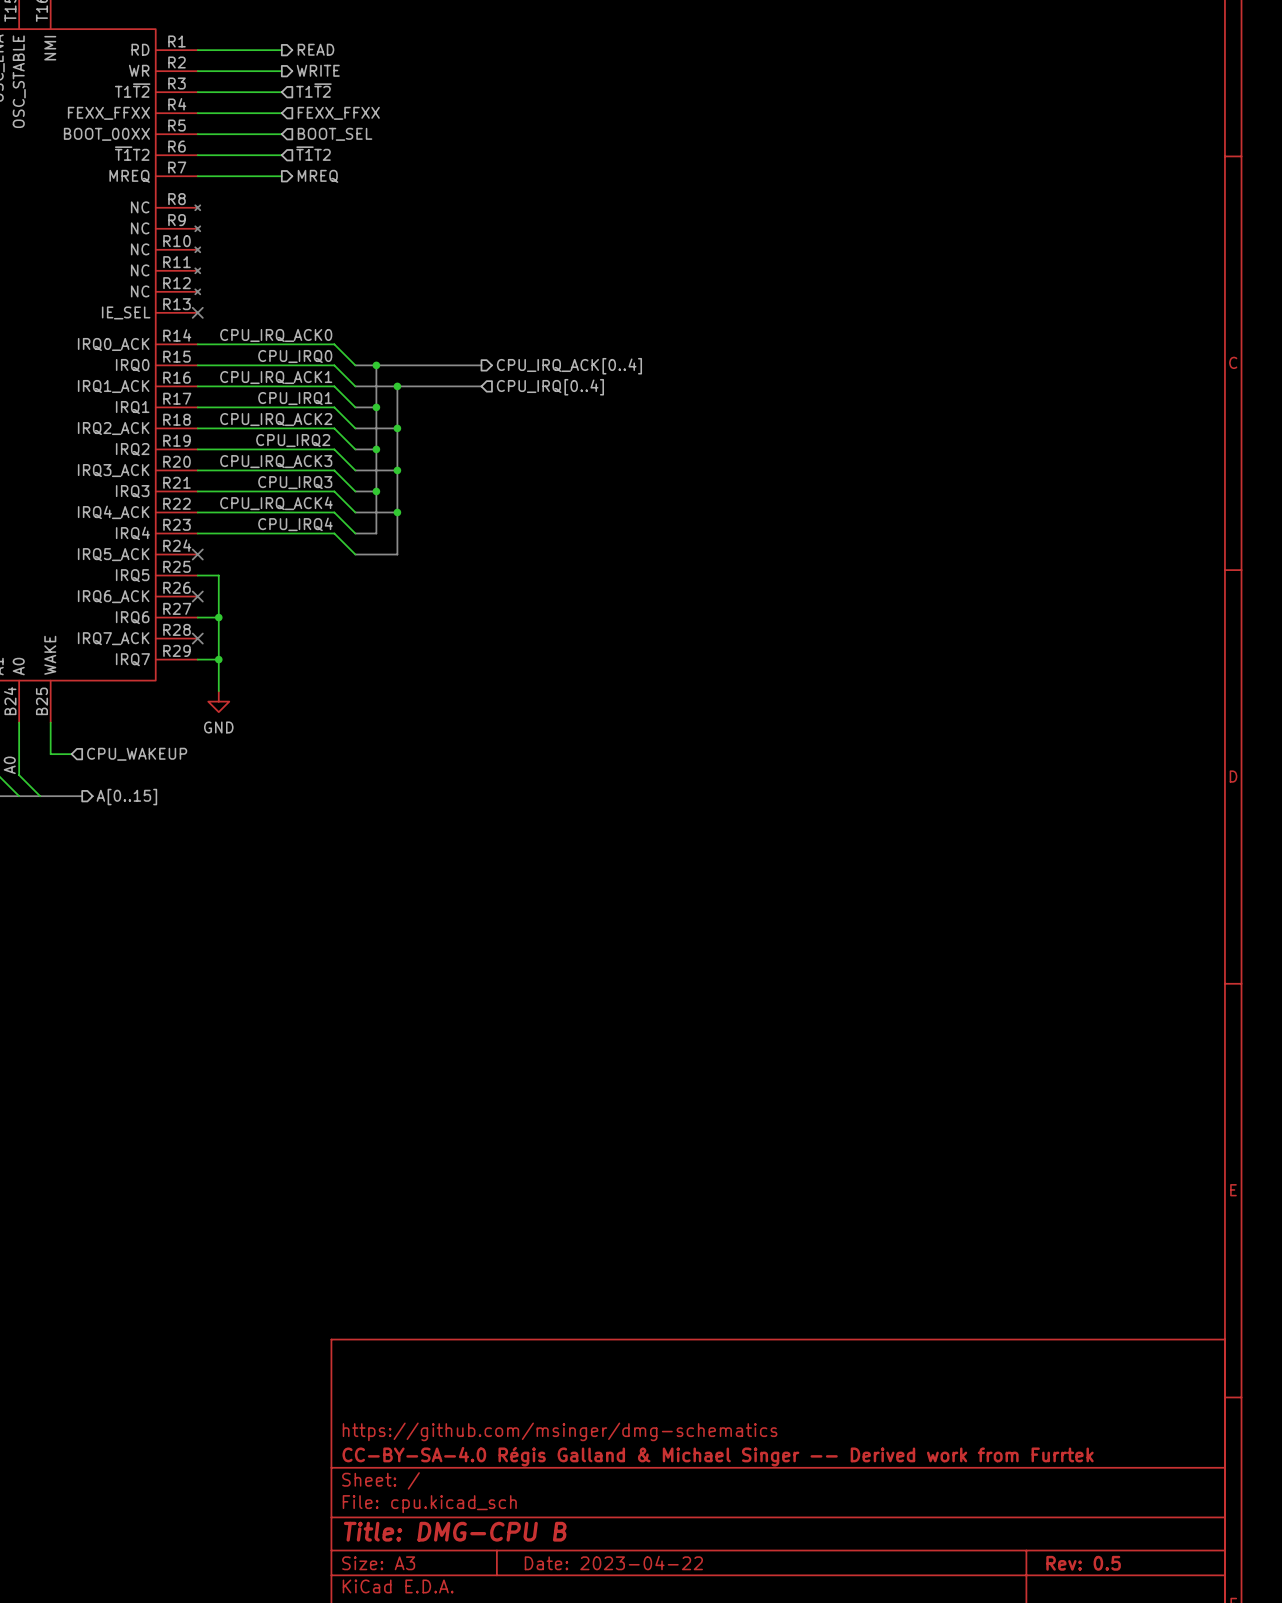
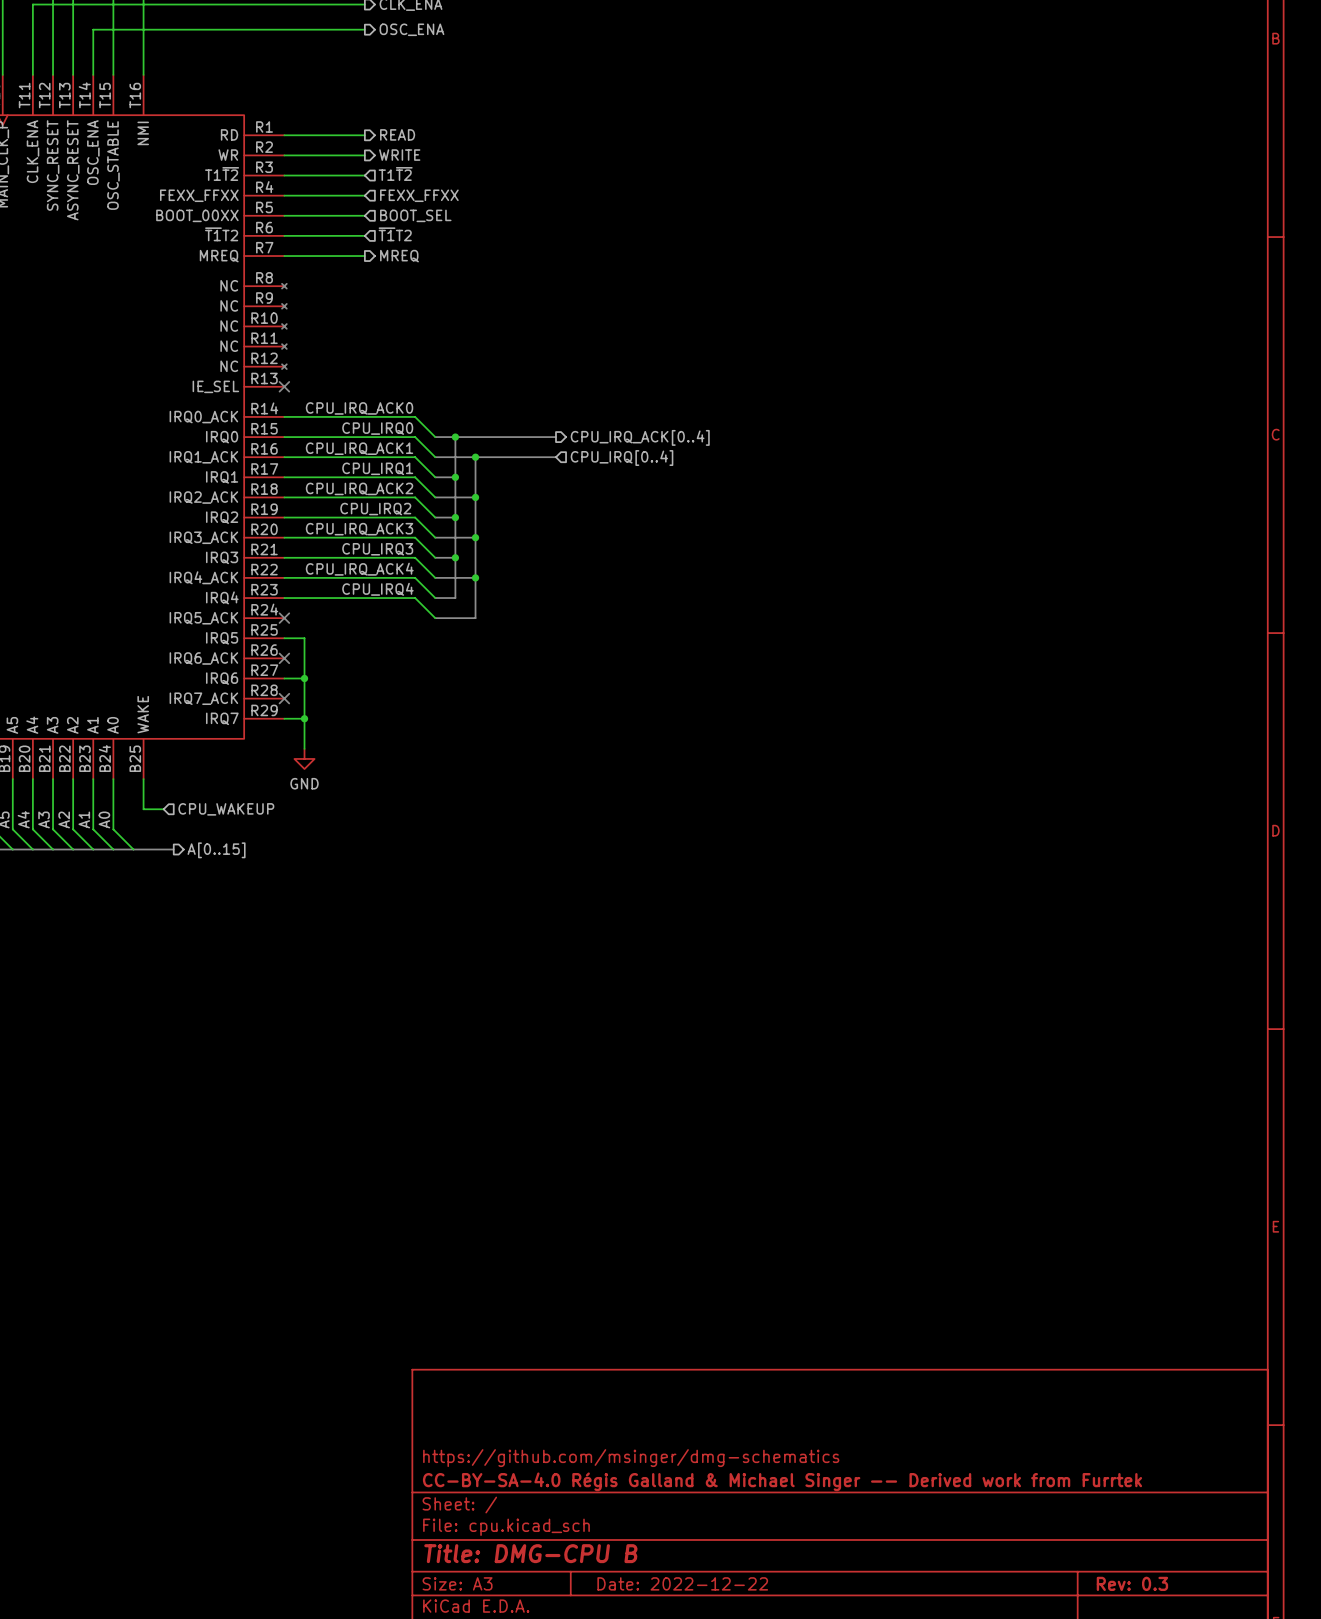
title block: Date: 2023-04-22 (613, 1563) -> Date: 2022-12-22 (682, 1583)
title block: Rev: 0.5 (1083, 1563) -> Rev: 0.3 (1132, 1583)

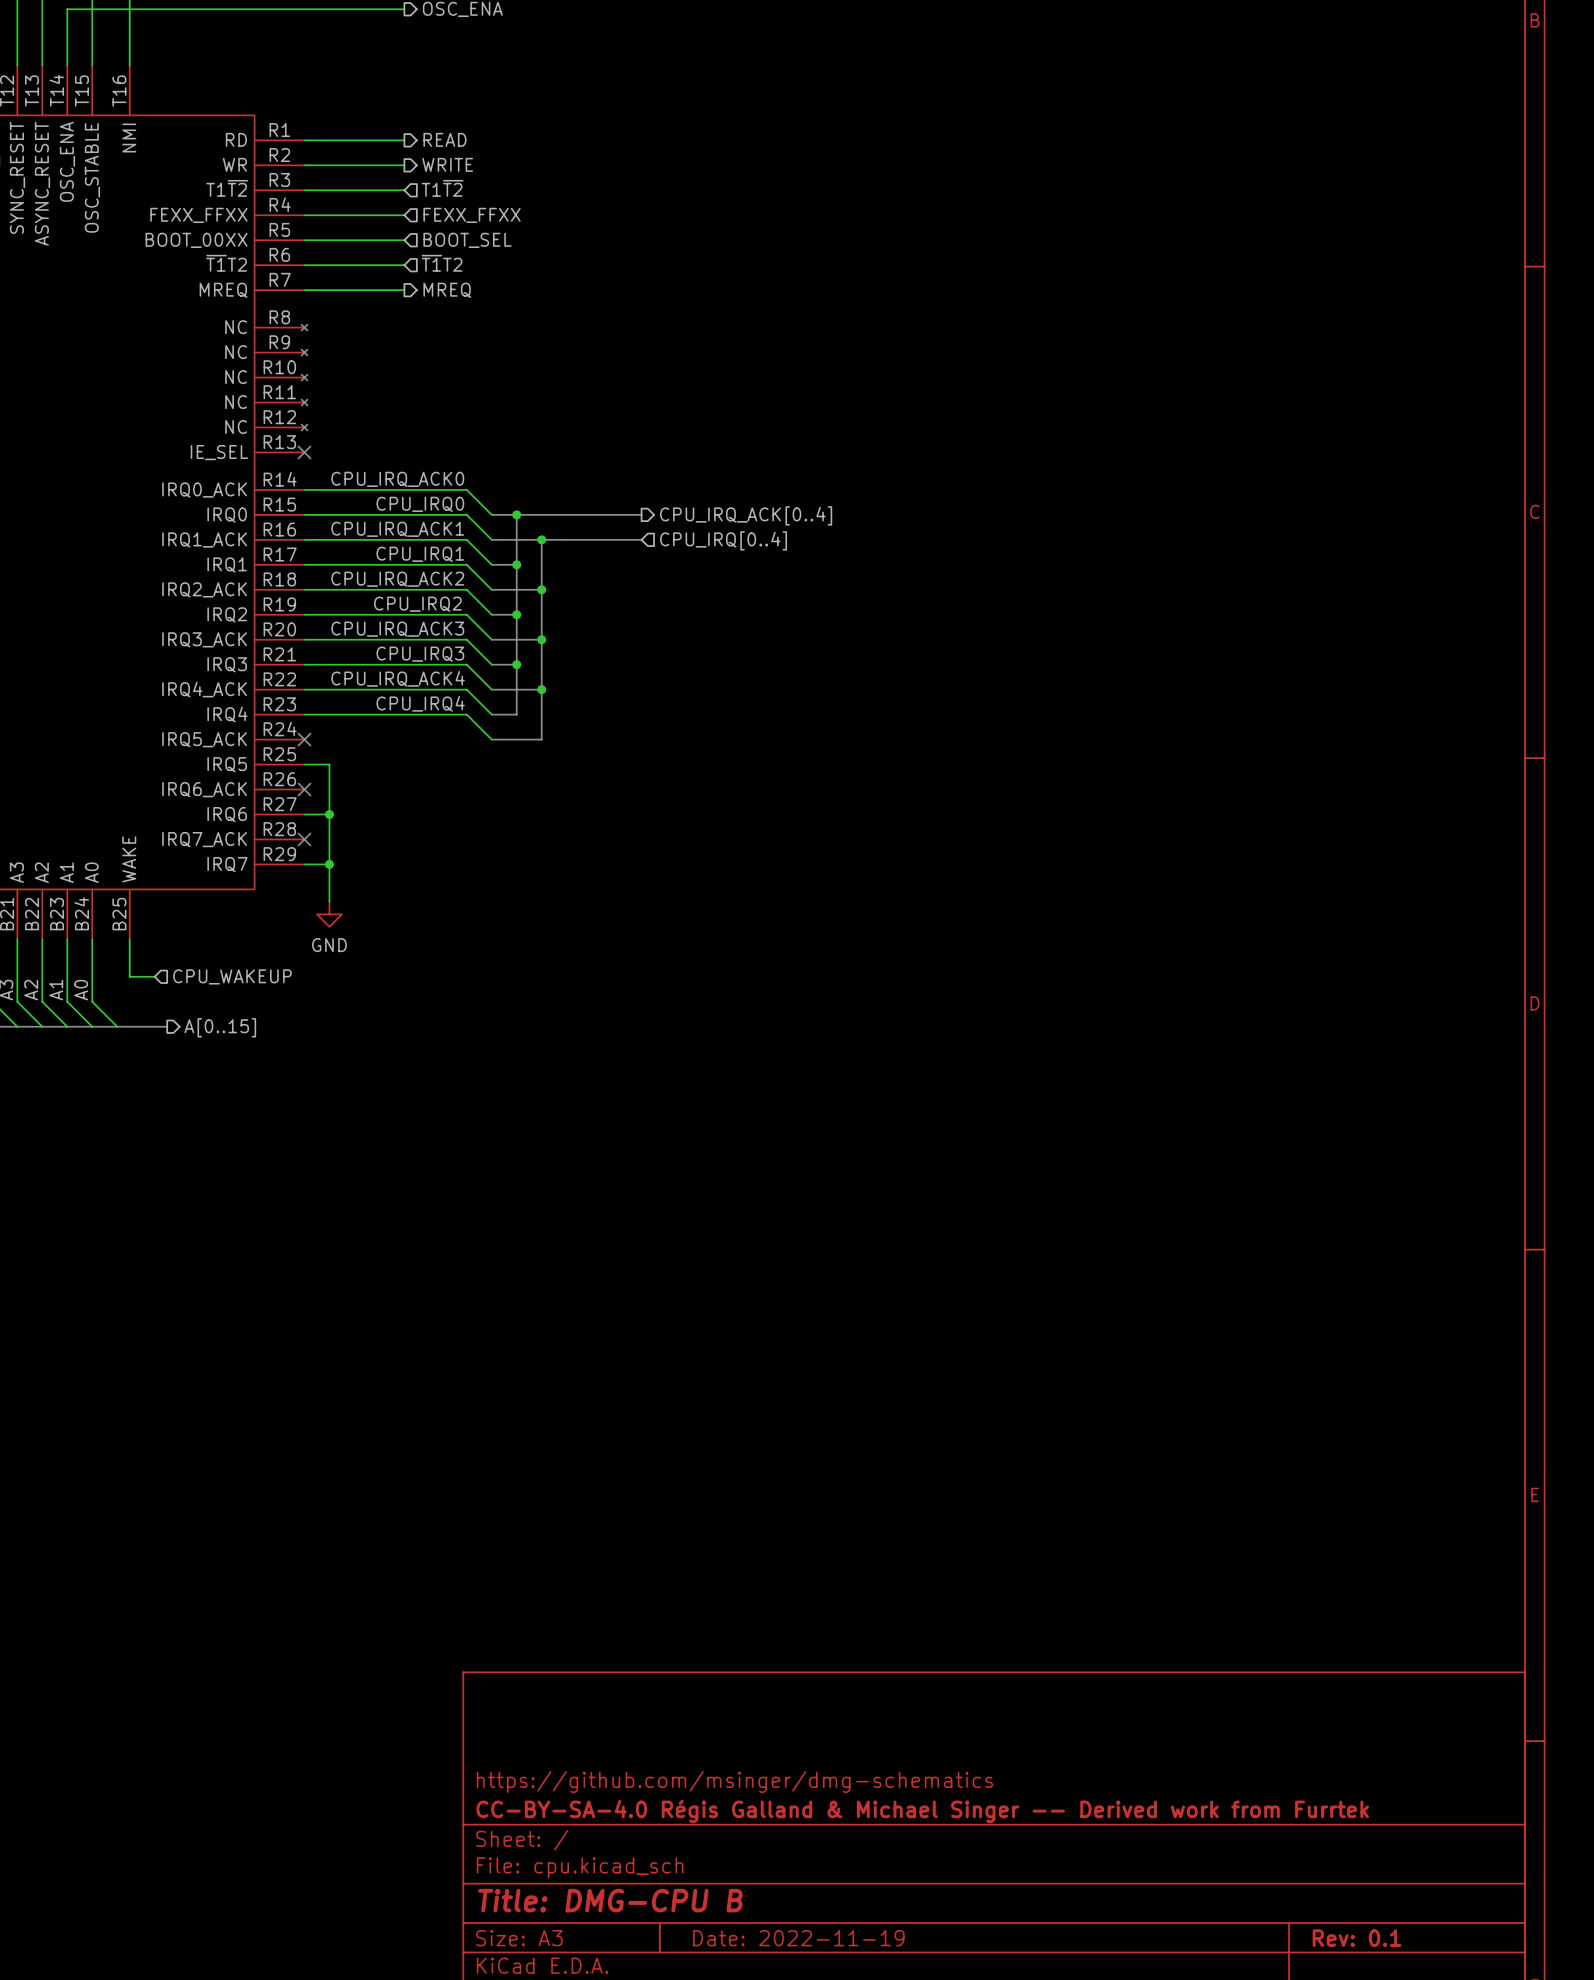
title block: Date: 2022-12-22 (682, 1583) -> Date: 2022-11-19 (798, 1938)
title block: Rev: 0.3 (1132, 1583) -> Rev: 0.1 (1356, 1938)

